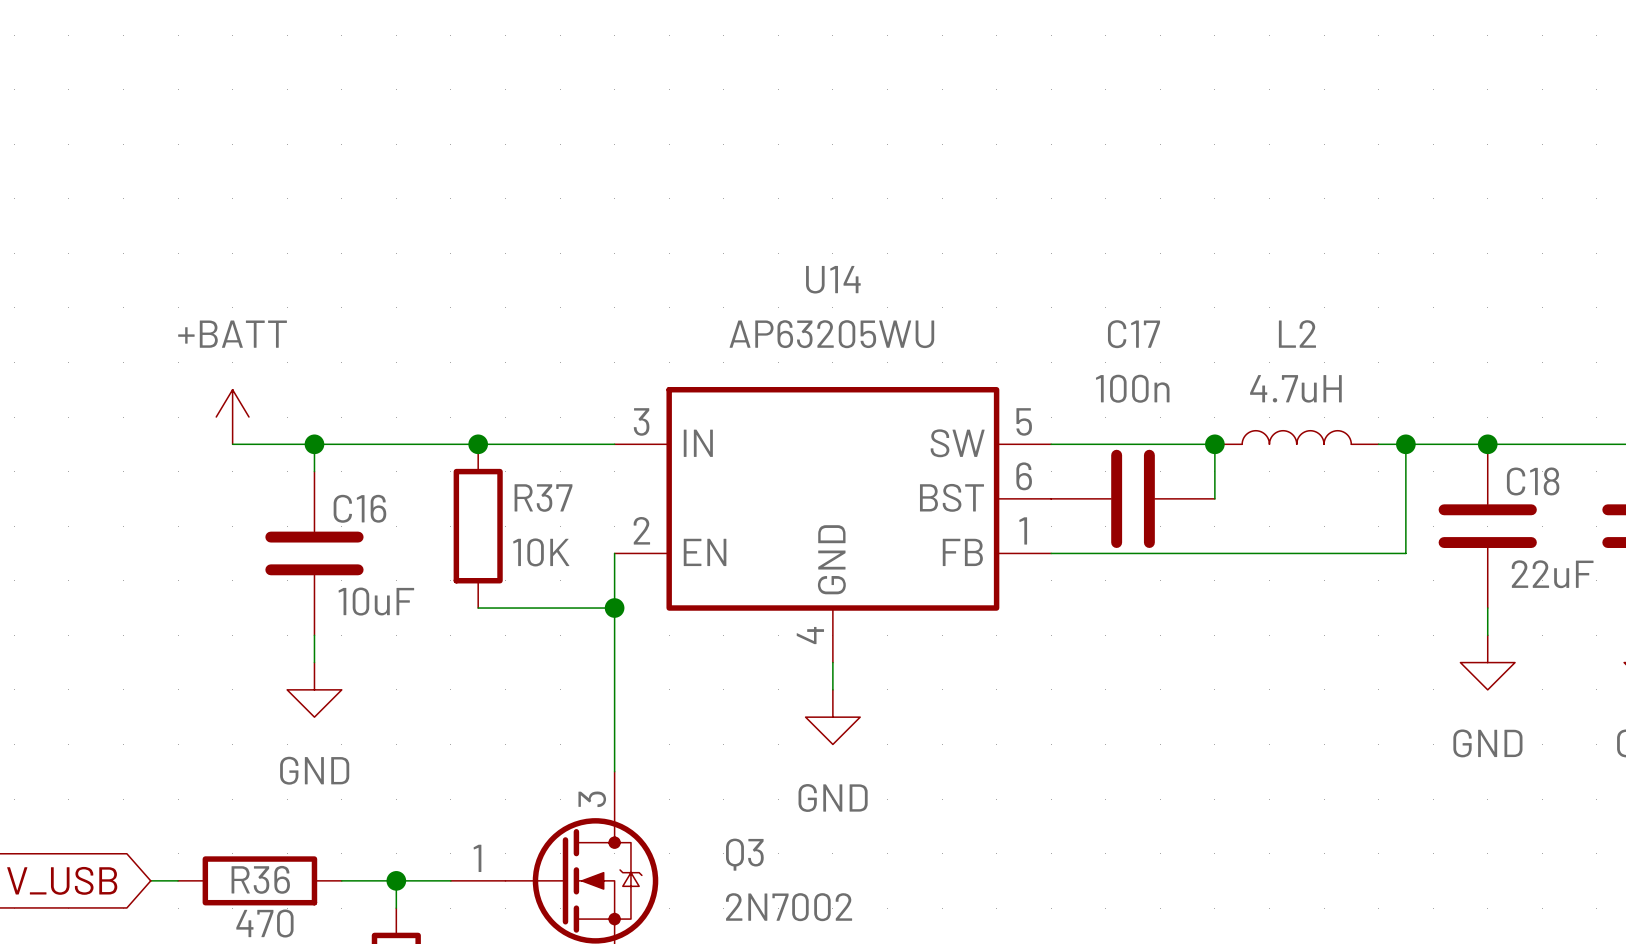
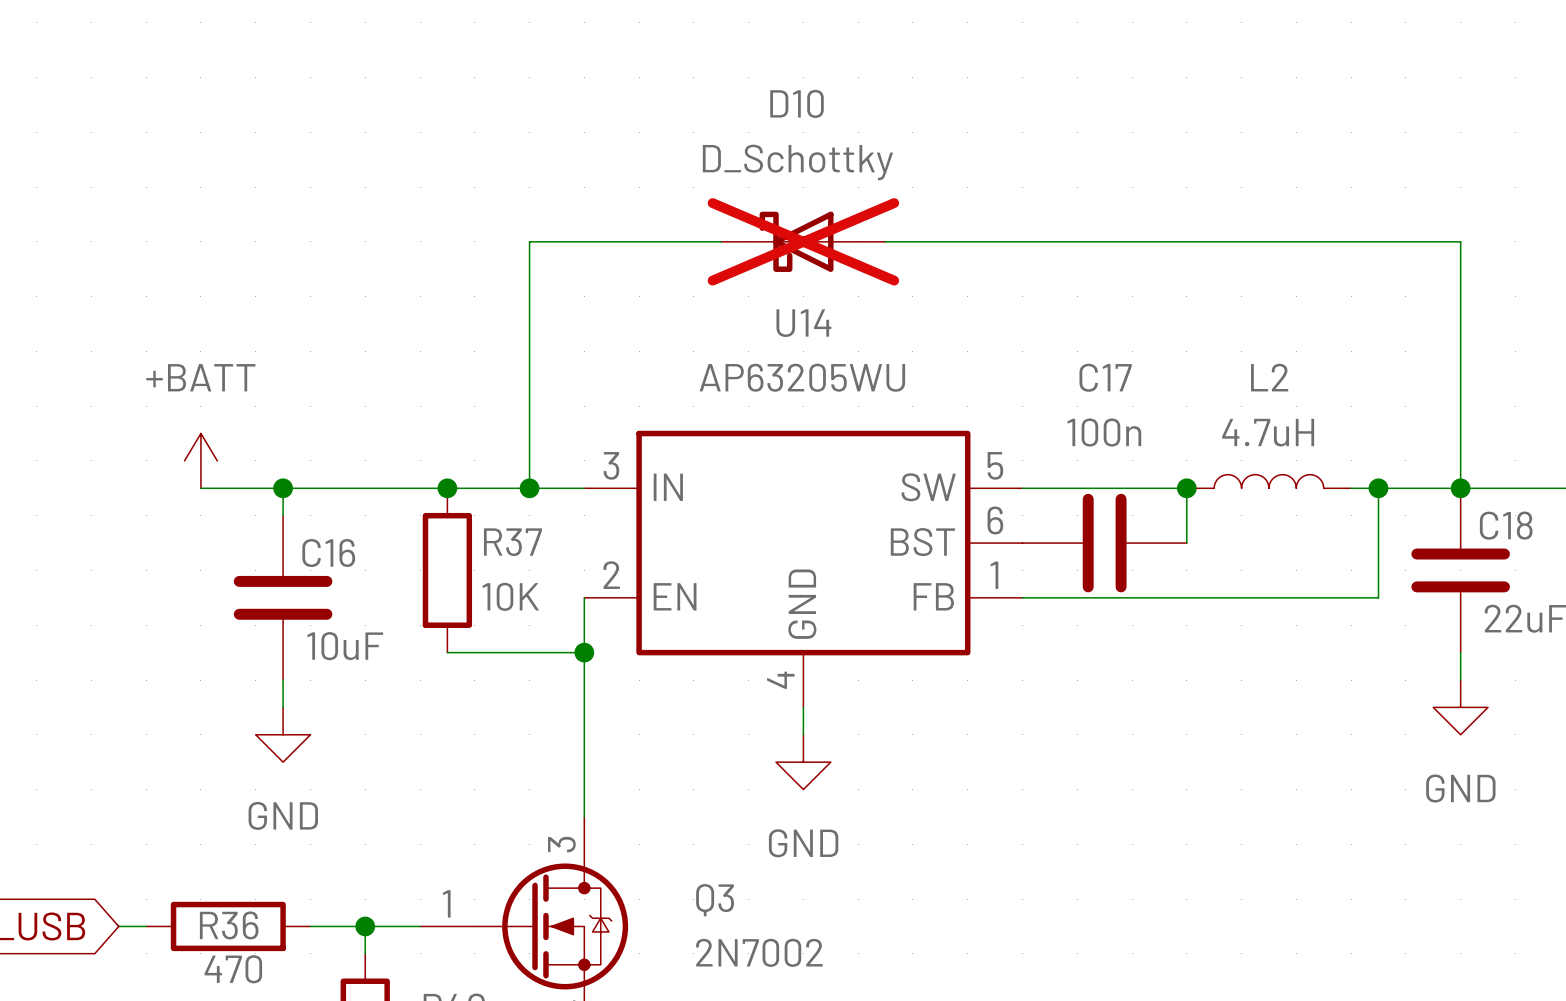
wire: none -> (721, 241) (529, 241) (529, 488)
D10: none -> D_Schottky (803, 241)
wire: none -> (885, 241) (1460, 241) (1460, 488)
junction: none -> (529, 488)

